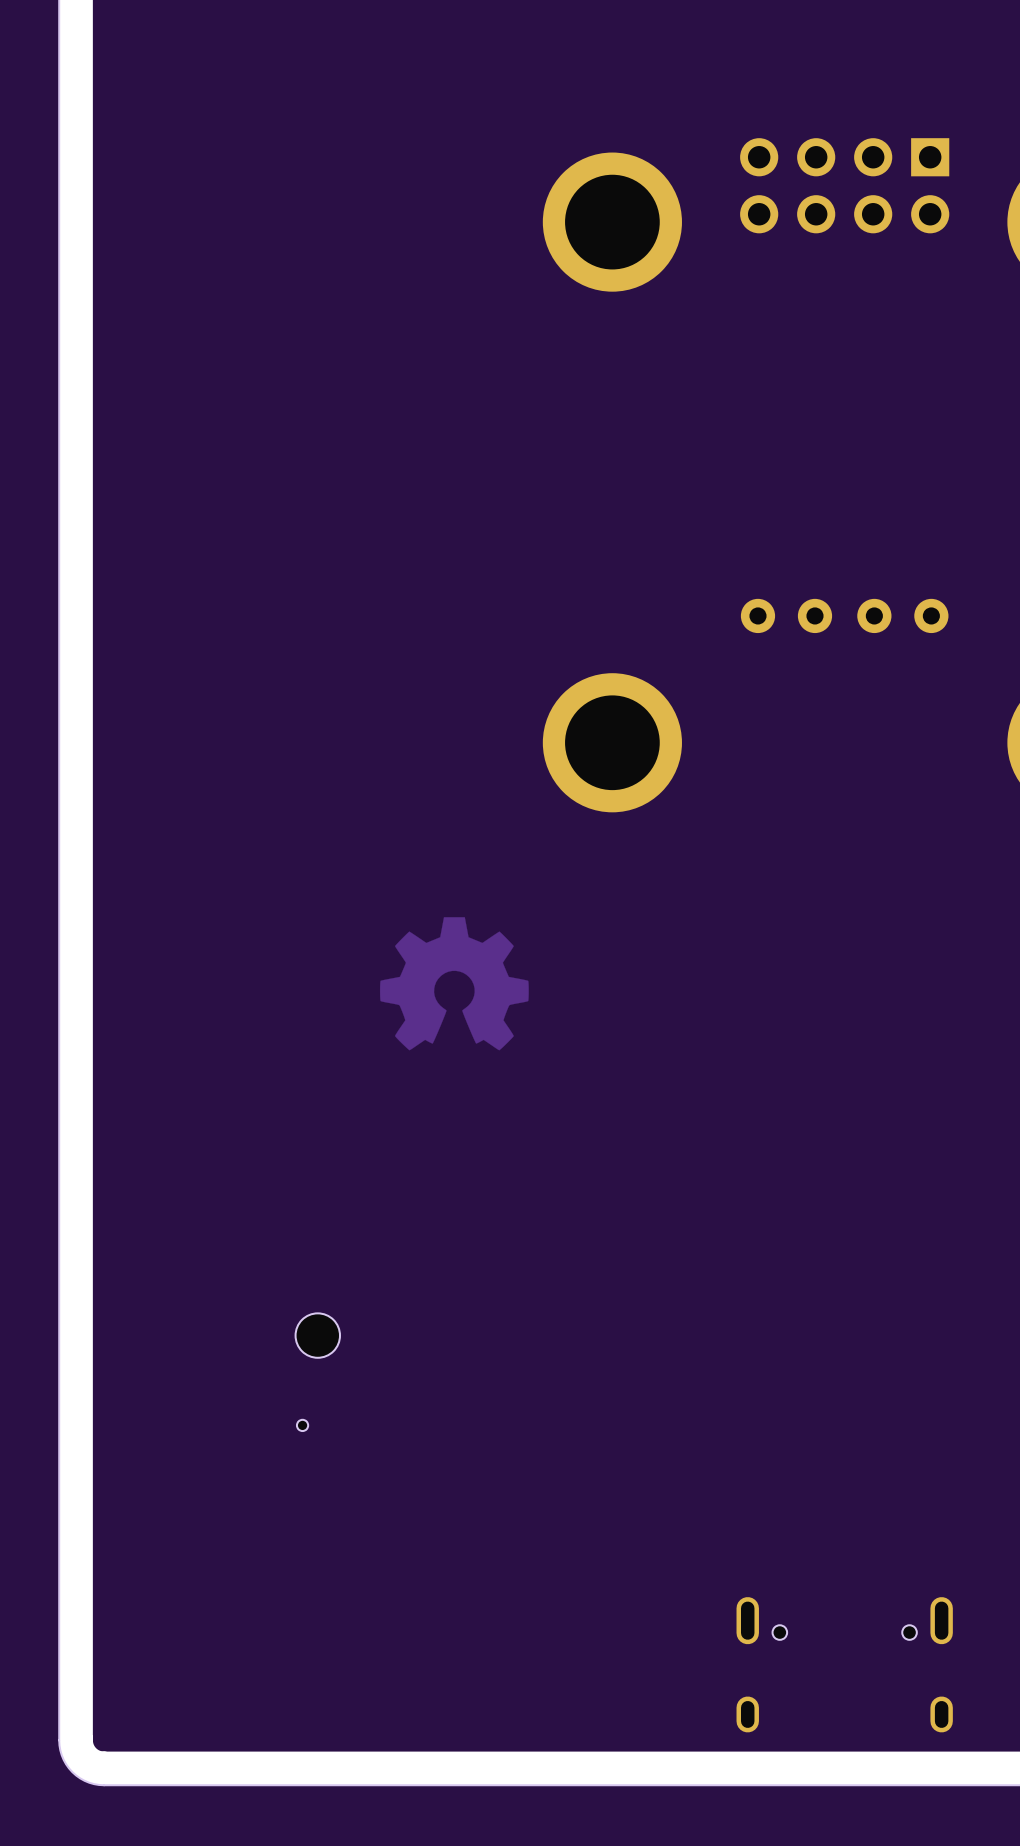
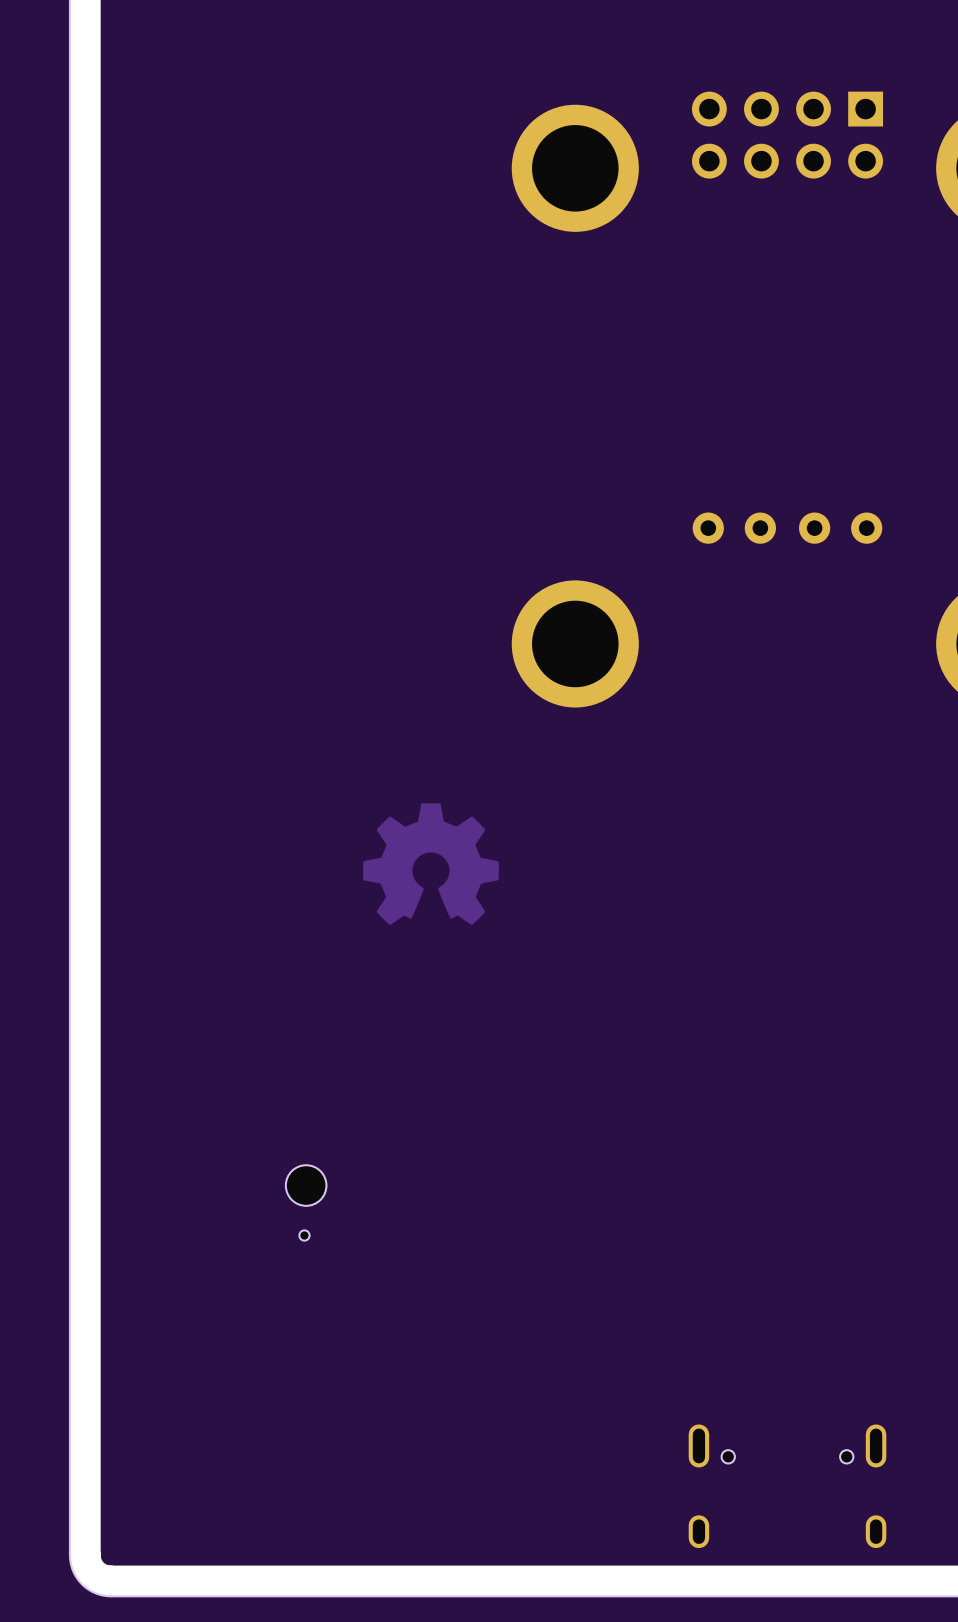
part position: (302, 1425) -> (304, 1235)

